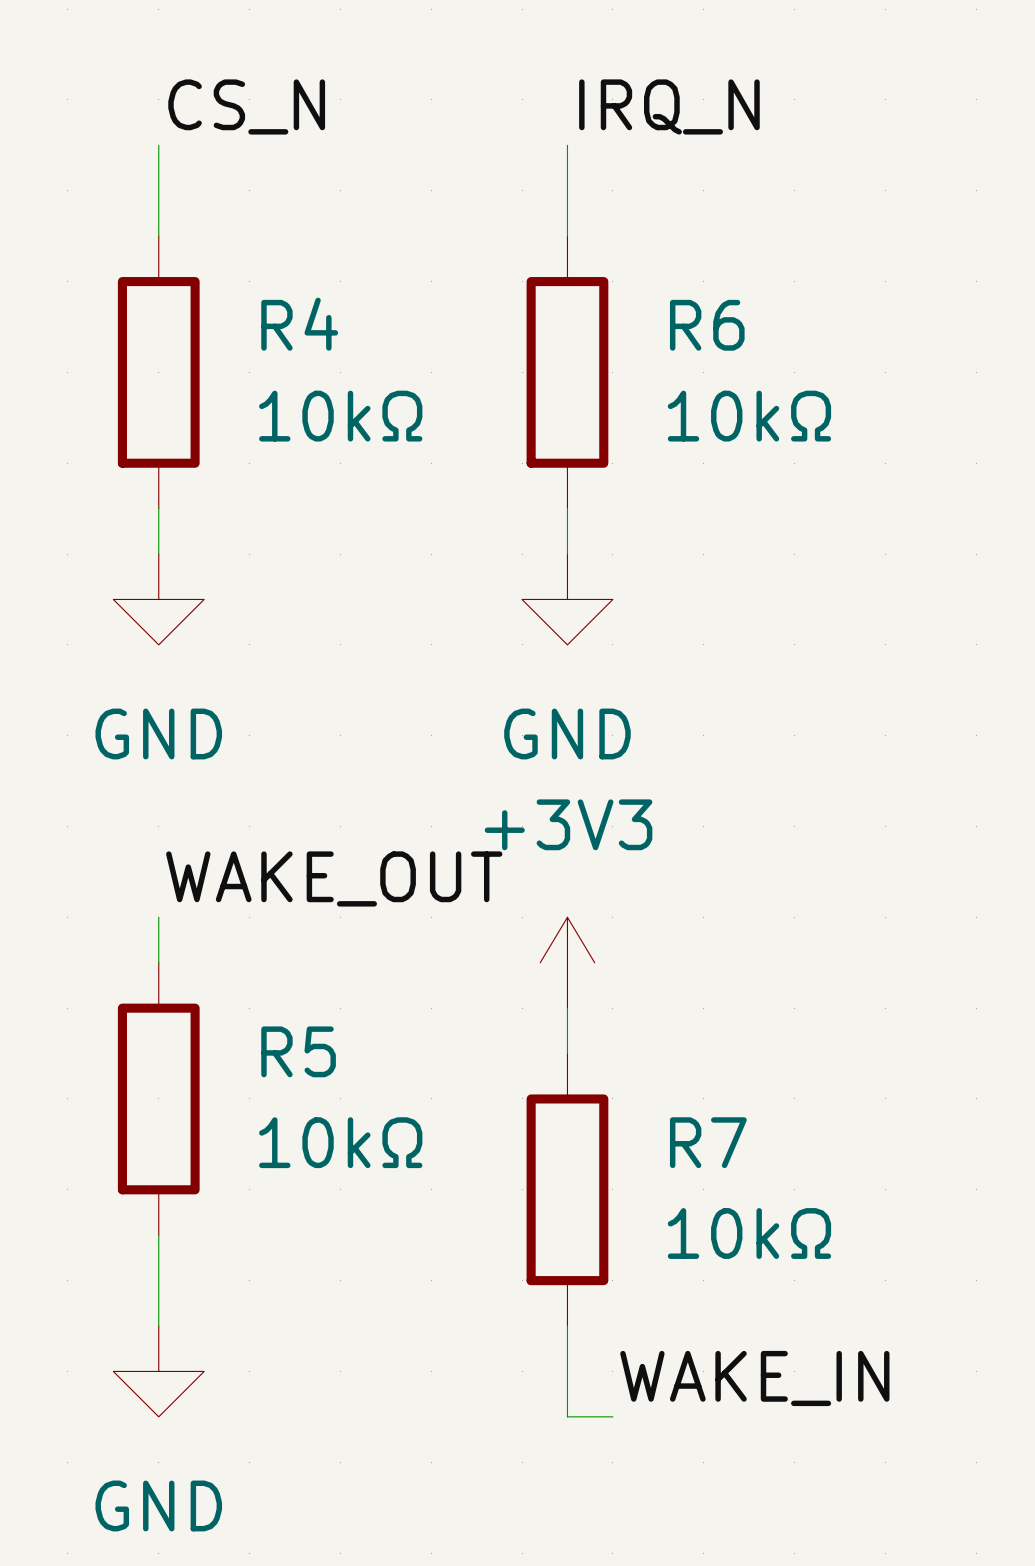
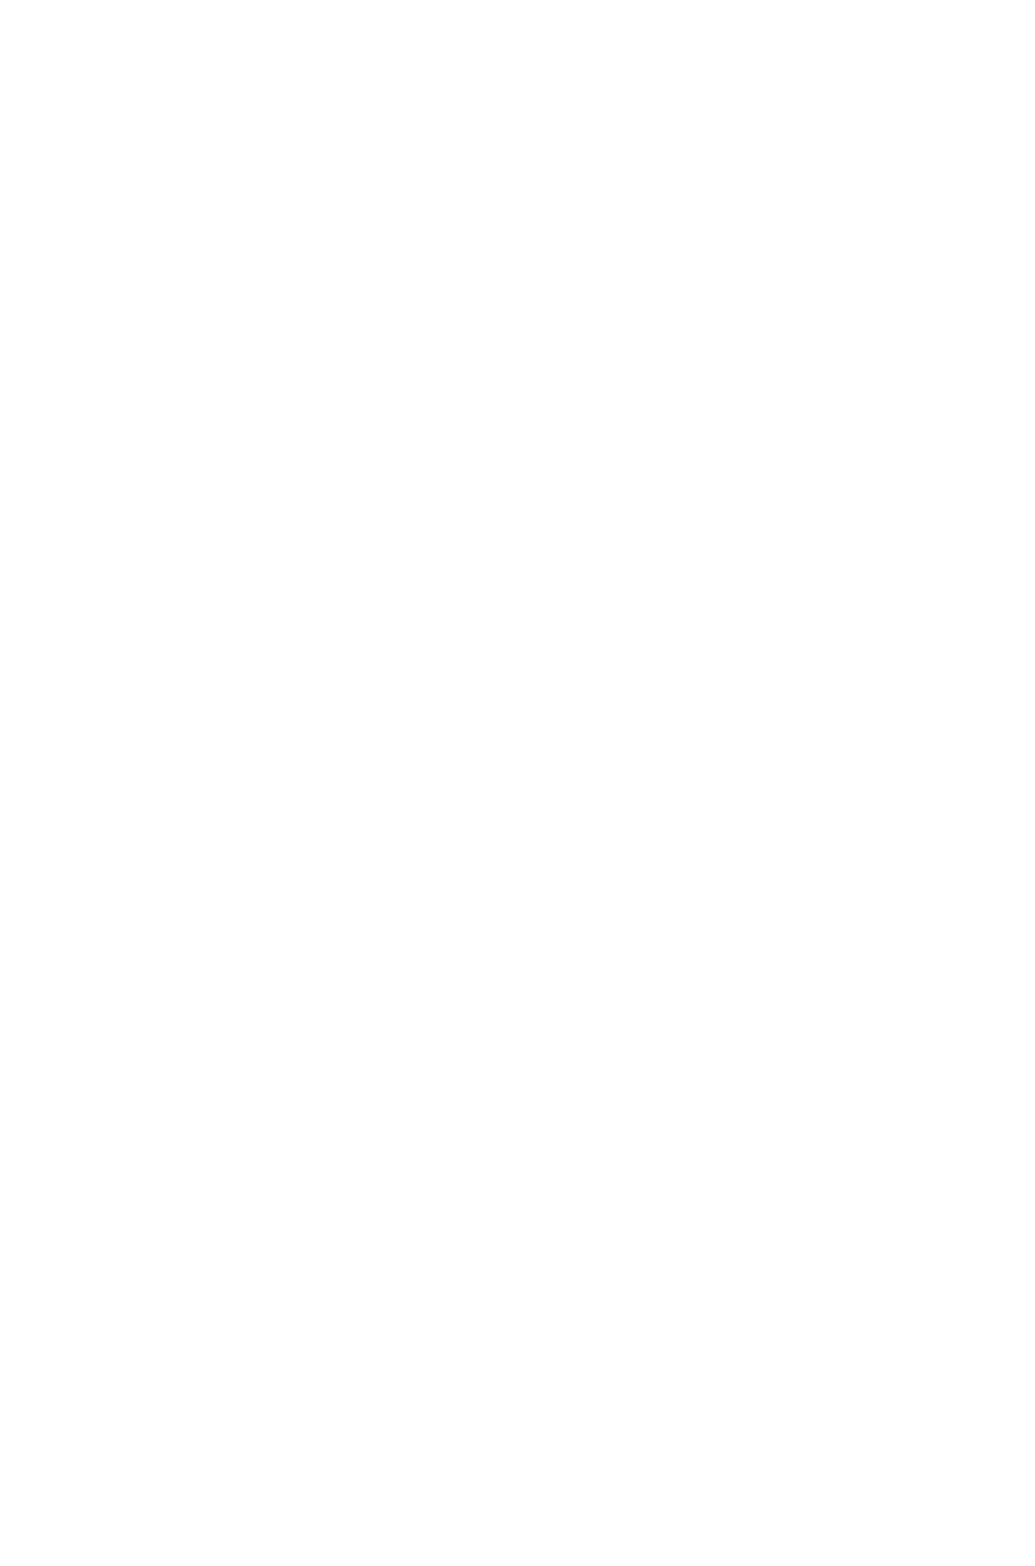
label: CS_N (246, 106) -> none
label: IRQ_N (669, 106) -> none
wire: (158, 145) (158, 236) -> none
wire: (567, 145) (567, 236) -> none
R4: 10kΩ (158, 372) -> none
R6: 10kΩ (567, 372) -> none
wire: (158, 508) (158, 554) -> none
wire: (567, 508) (567, 554) -> none
power symbol: GND (158, 599) -> none
power symbol: GND (567, 599) -> none
label: WAKE_OUT (334, 878) -> none
wire: (158, 917) (158, 962) -> none
power symbol: +3V3 (567, 962) -> none
wire: (567, 1008) (567, 1053) -> none
R5: 10kΩ (158, 1098) -> none
R7: 10kΩ (567, 1189) -> none
wire: (158, 1235) (158, 1326) -> none
wire: (567, 1326) (567, 1416) (612, 1416) -> none
power symbol: GND (158, 1371) -> none
label: WAKE_IN (754, 1378) -> none

